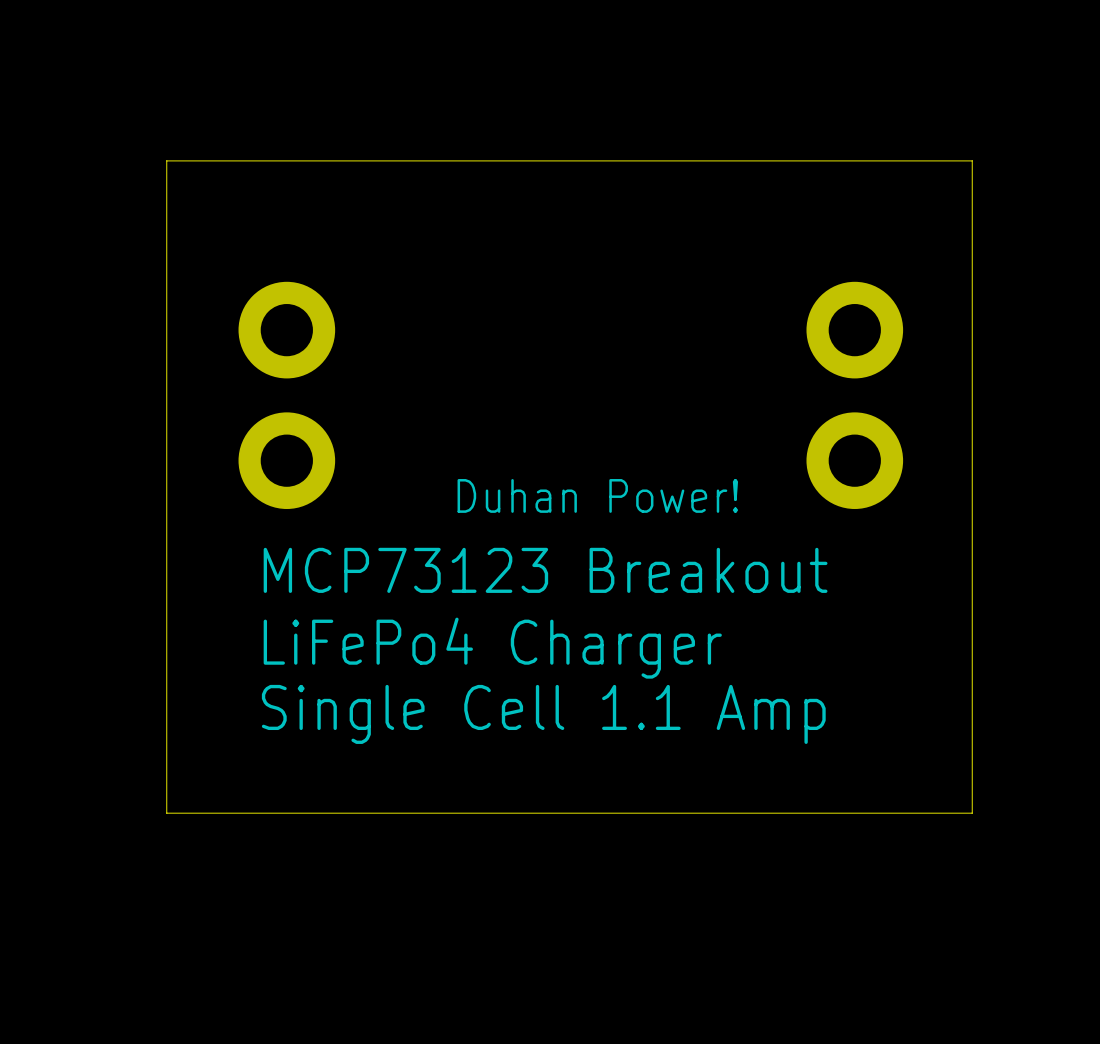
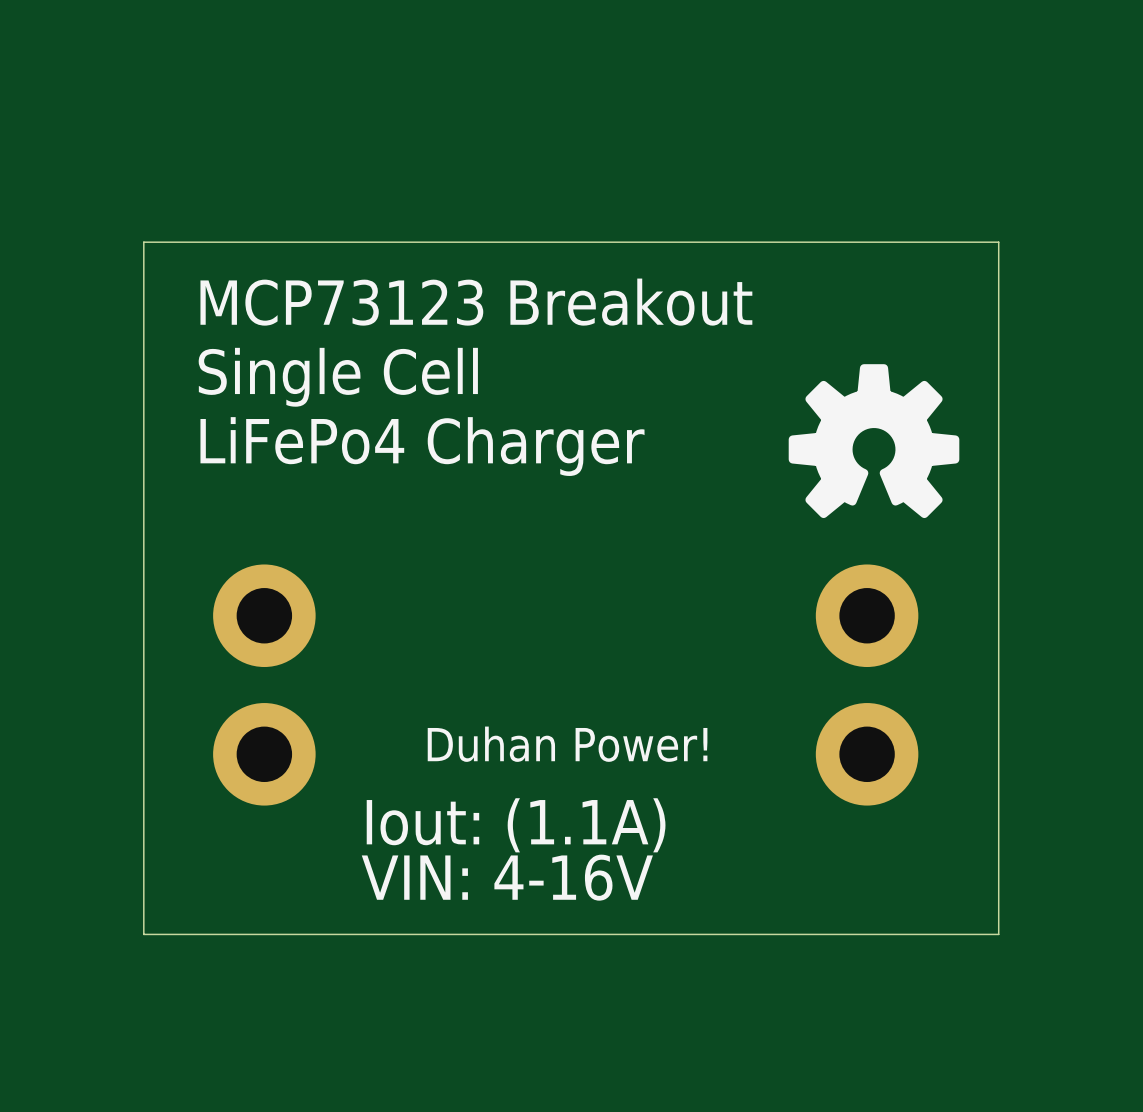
drawing: none -> [788, 364, 960, 519]
text: none -> Single Cell (338, 377)
part position: (286, 395) -> (264, 685)
part position: (854, 395) -> (867, 685)
text position: Duhan Power! (597, 495) -> Duhan Power! (567, 744)
text position: MCP73123 Breakout (545, 570) -> MCP73123 Breakout (476, 302)
text position: LiFePo4 Charger (492, 648) -> LiFePo4 Charger (422, 446)
text: none -> Iout: (1.1A) (516, 825)
text: Single Cell 1.1 Amp (543, 714) -> none
text: none -> VIN: 4-16V (507, 877)

